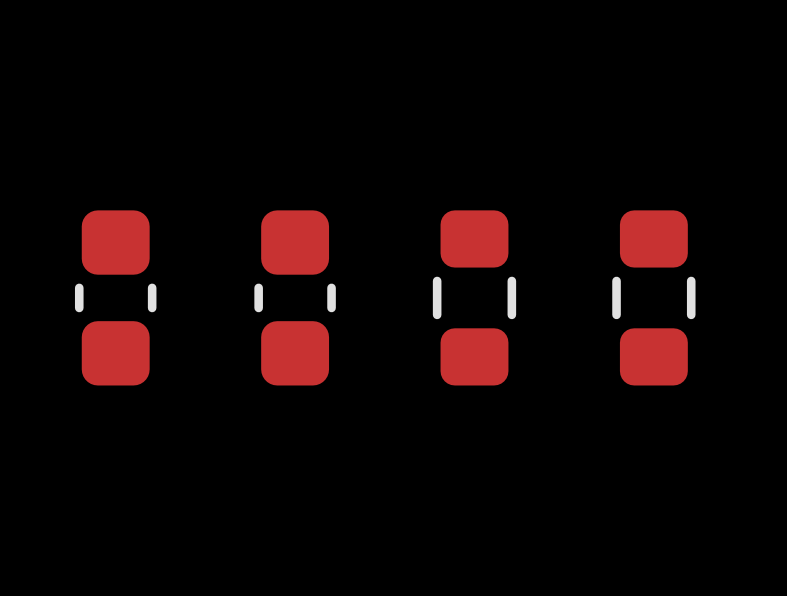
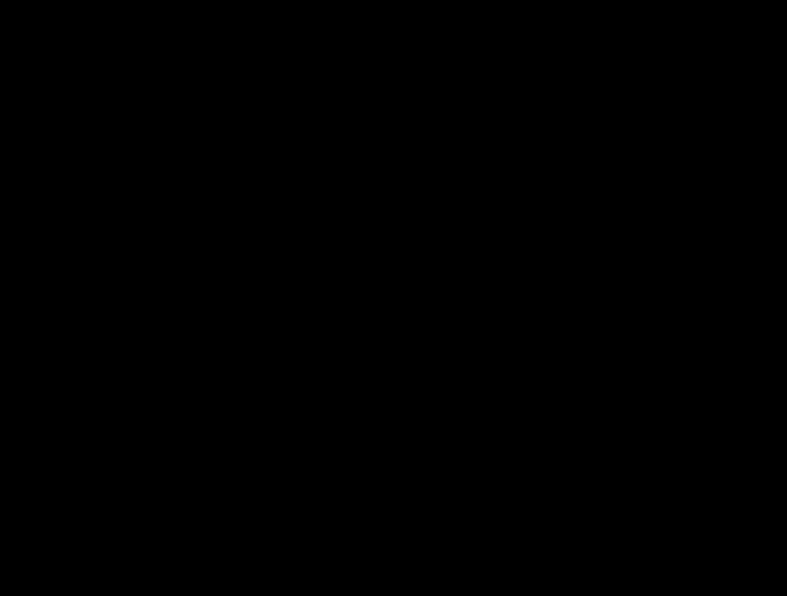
part: (115, 297) -> none
part: (295, 297) -> none
part: (474, 297) -> none
part: (653, 297) -> none

